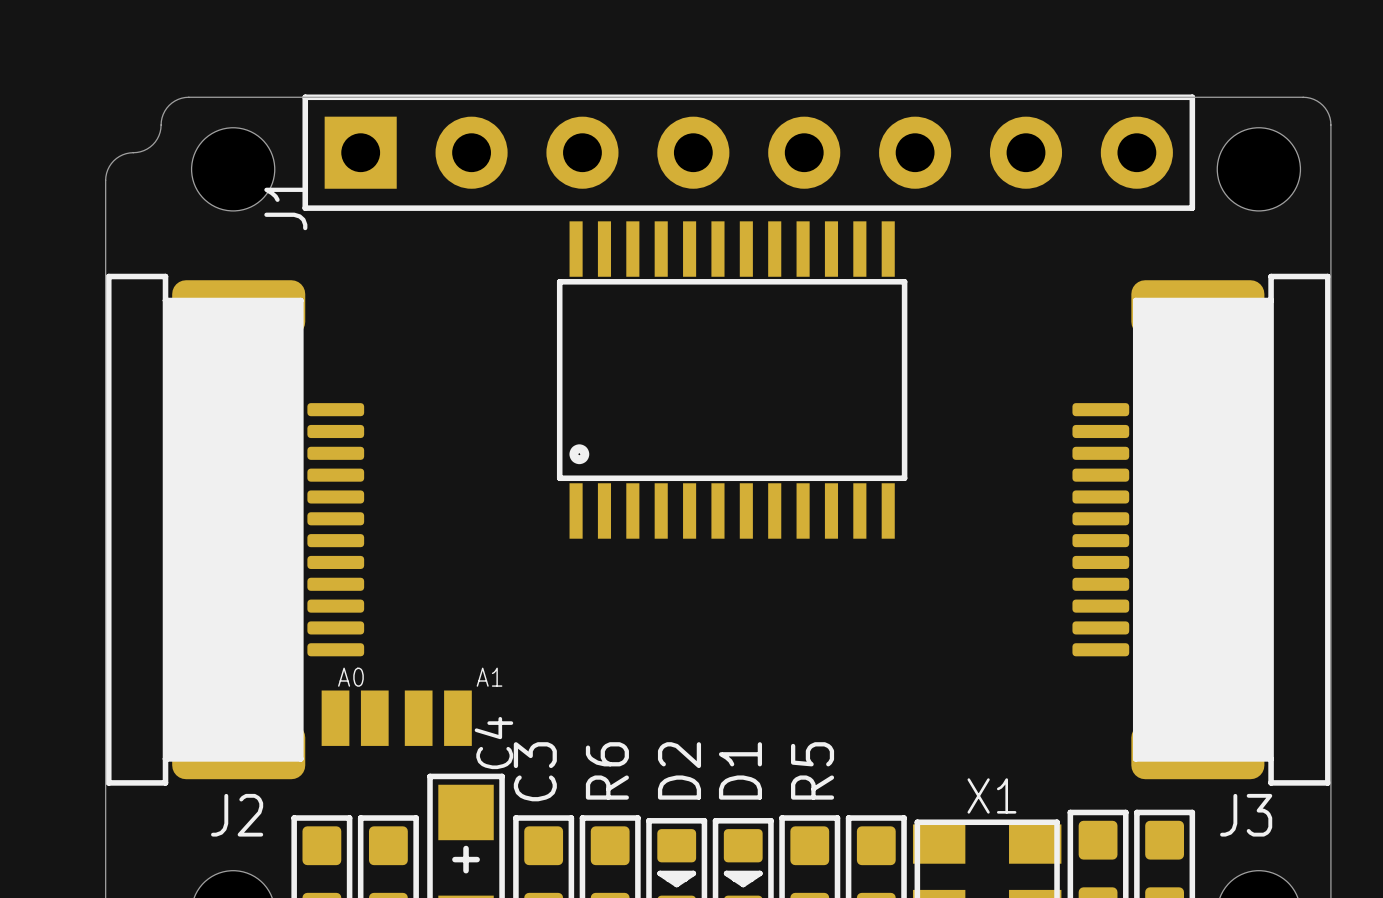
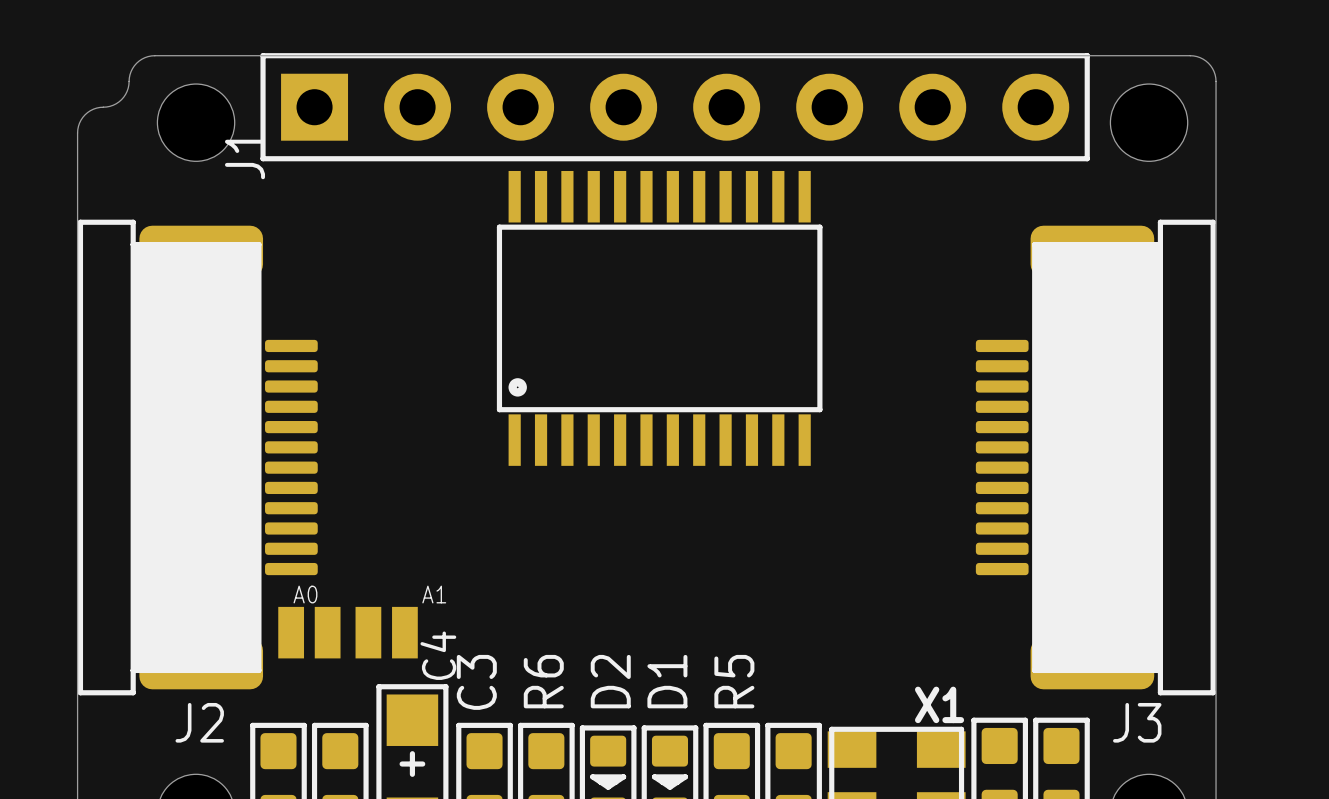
X1 name position: X1 (991, 795) -> X1 (939, 704)

